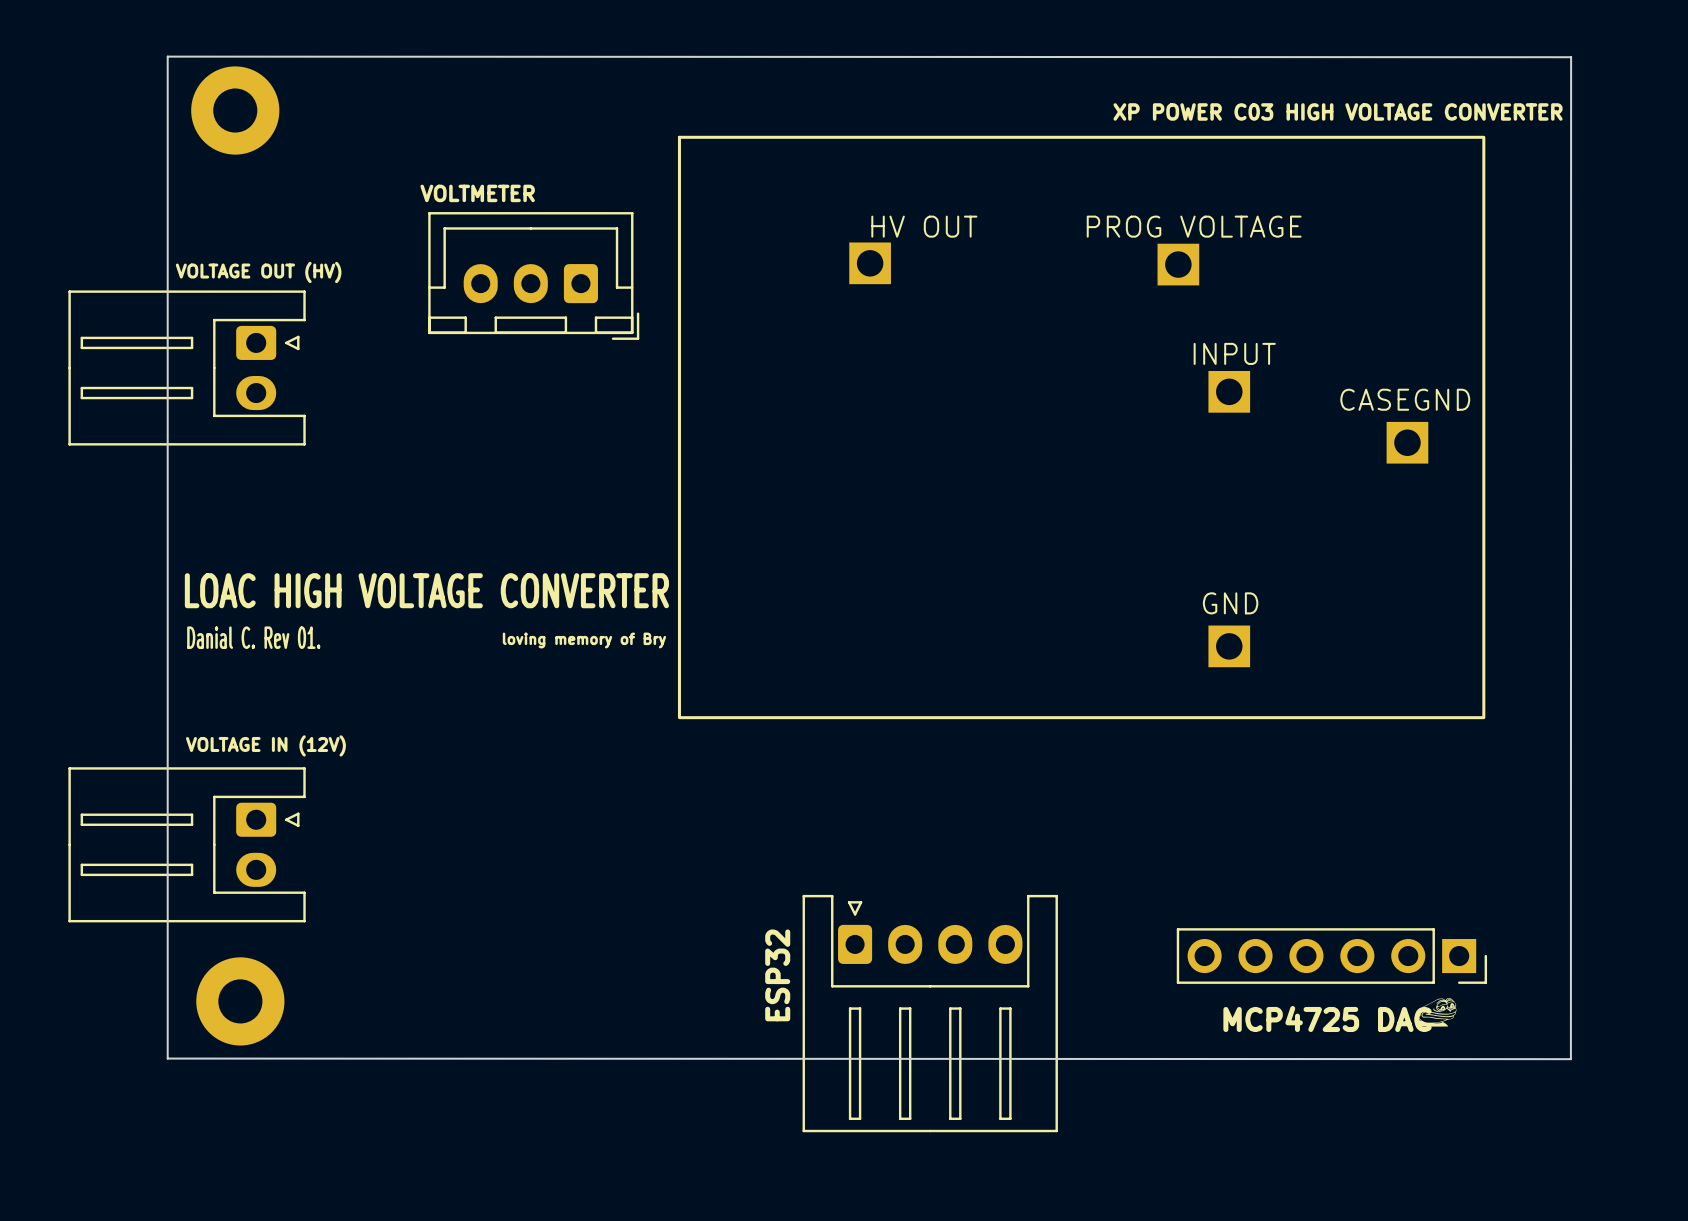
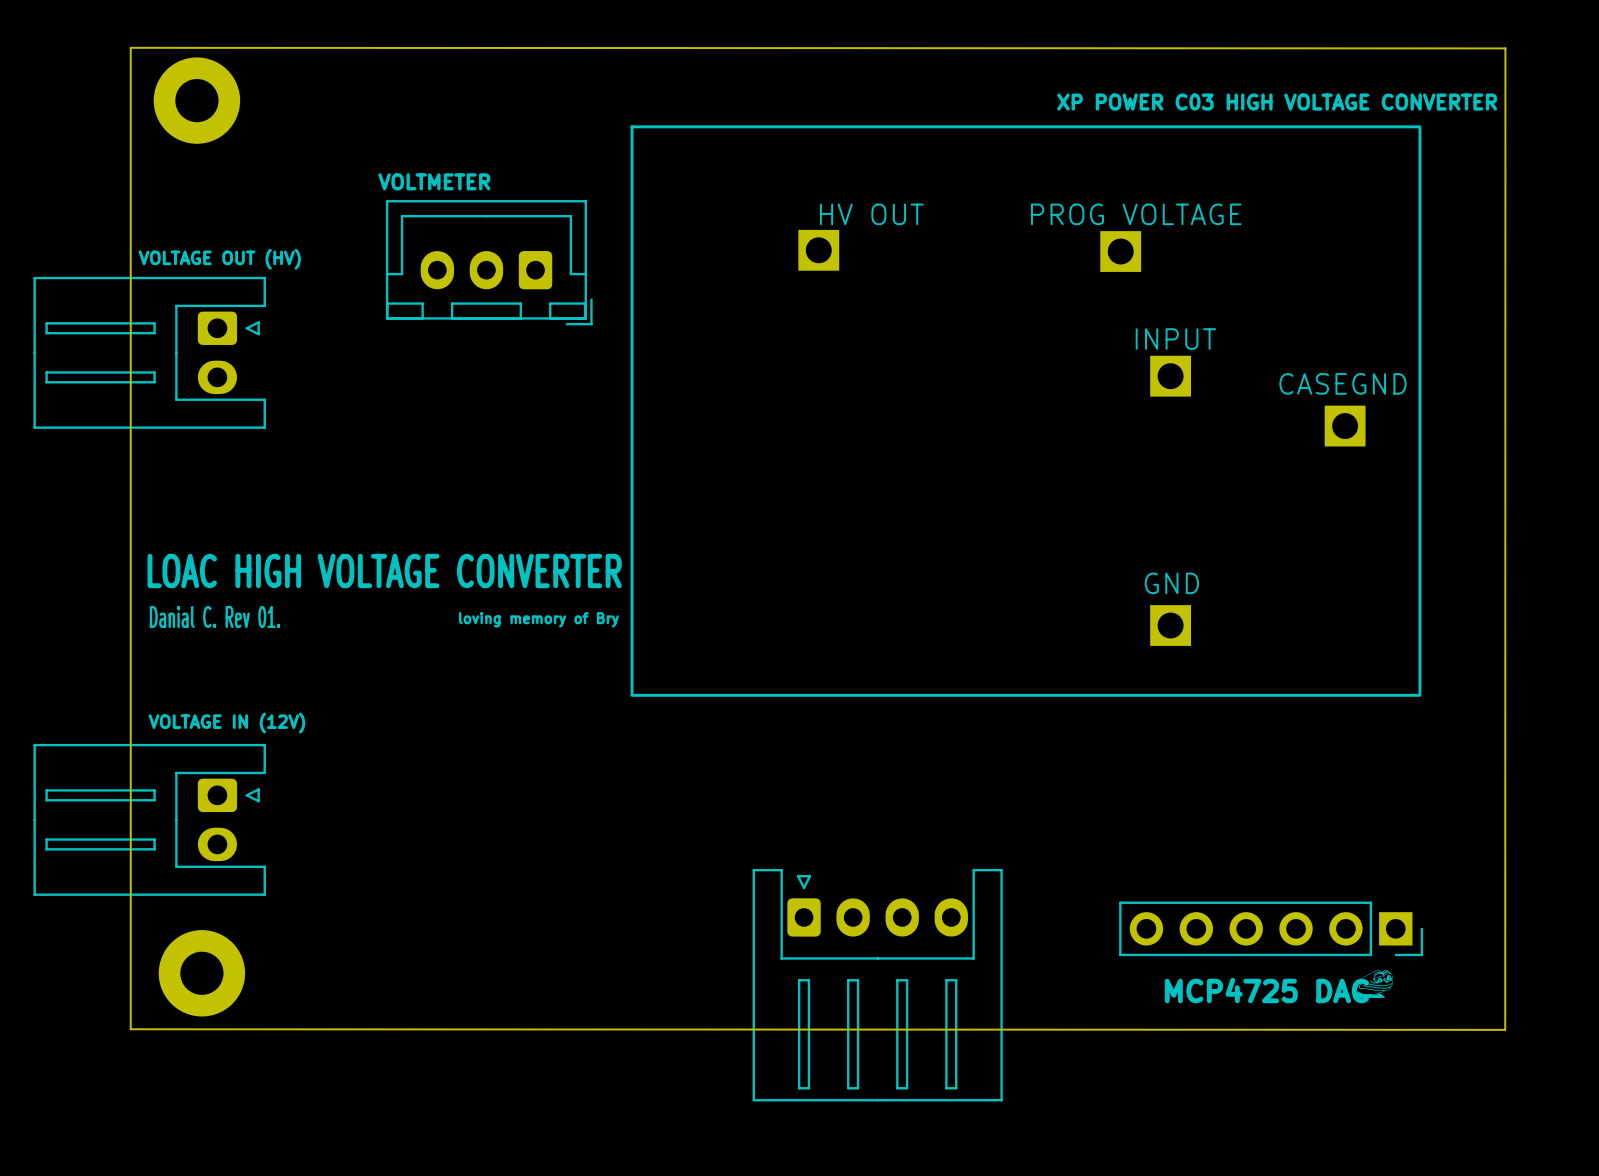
text: ESP32 (777, 975) -> none

